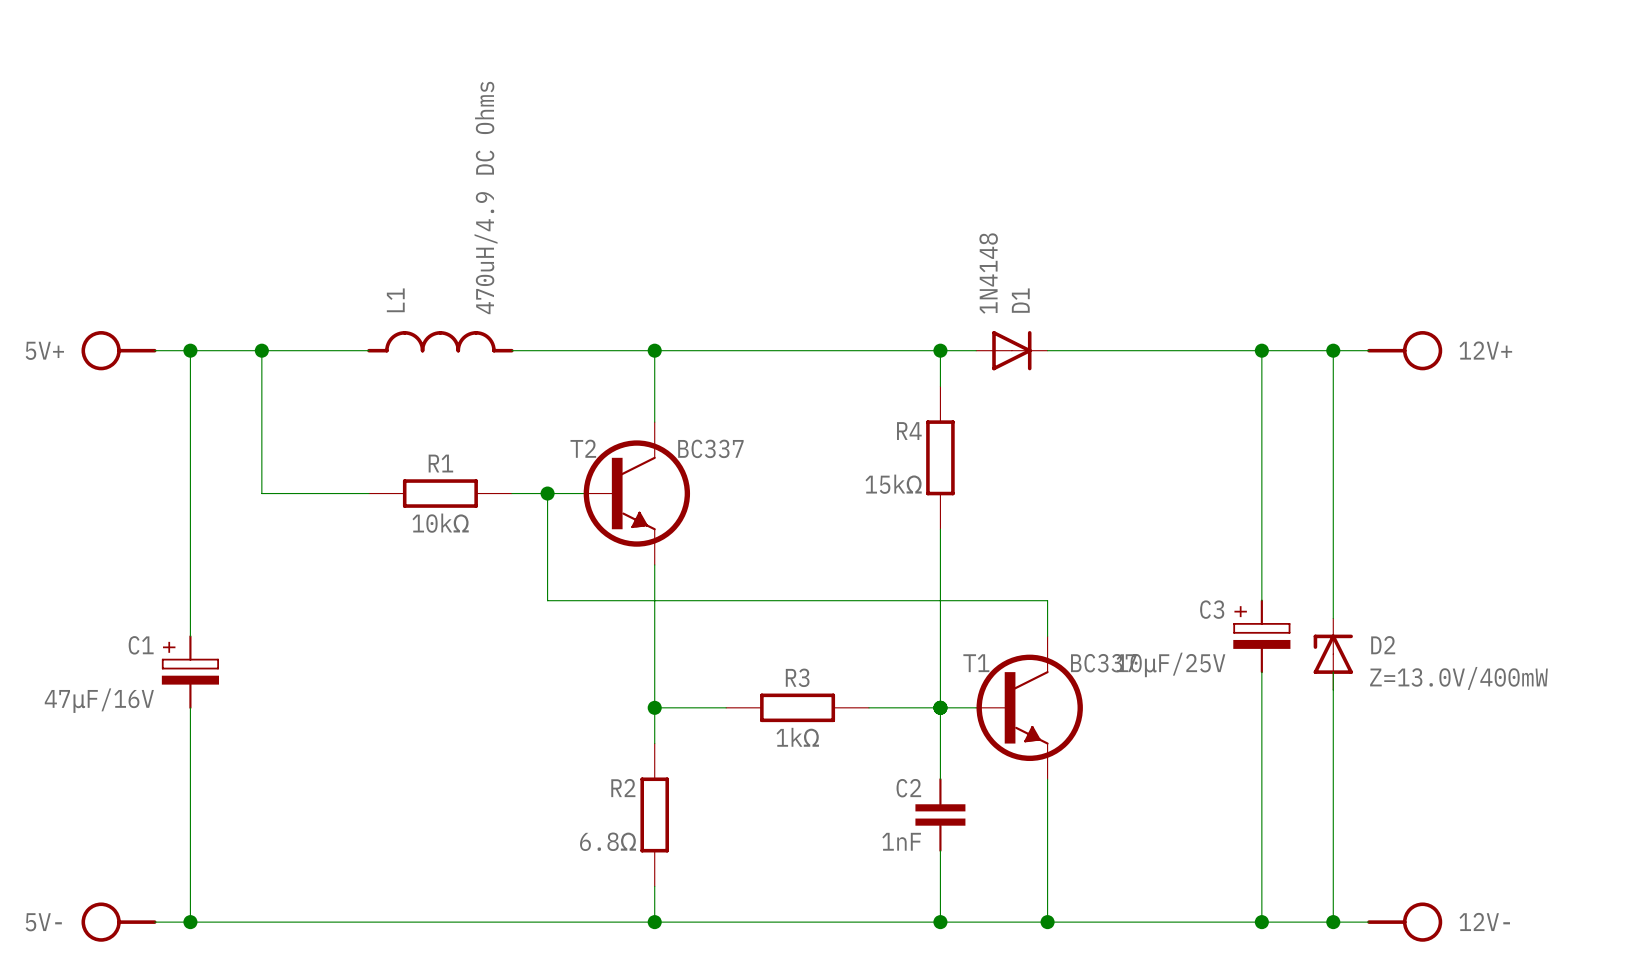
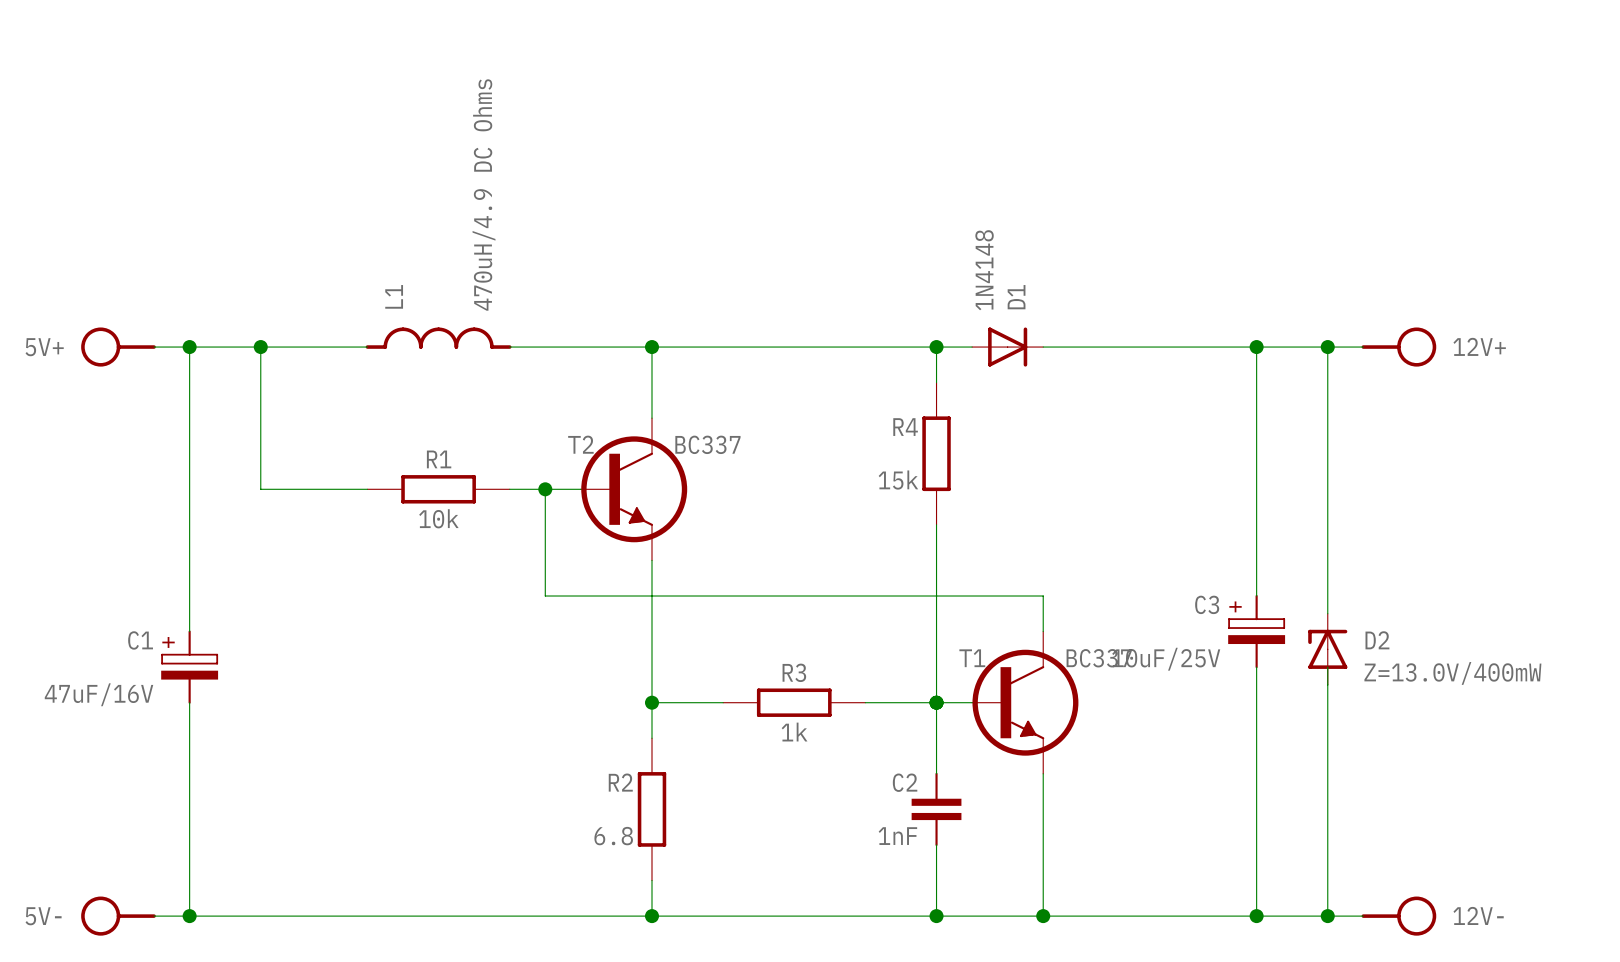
R4 value: 15kΩ (893, 484) -> 15k (898, 480)
R1 value: 10kΩ (440, 523) -> 10k (438, 518)
C3 value: 10μF/25V (1170, 664) -> 10uF/25V (1166, 659)
C1 value: 47μF/16V (99, 700) -> 47uF/16V (99, 694)
R3 value: 1kΩ (797, 737) -> 1k (794, 732)
R2 value: 6.8Ω (608, 841) -> 6.8 (613, 836)

